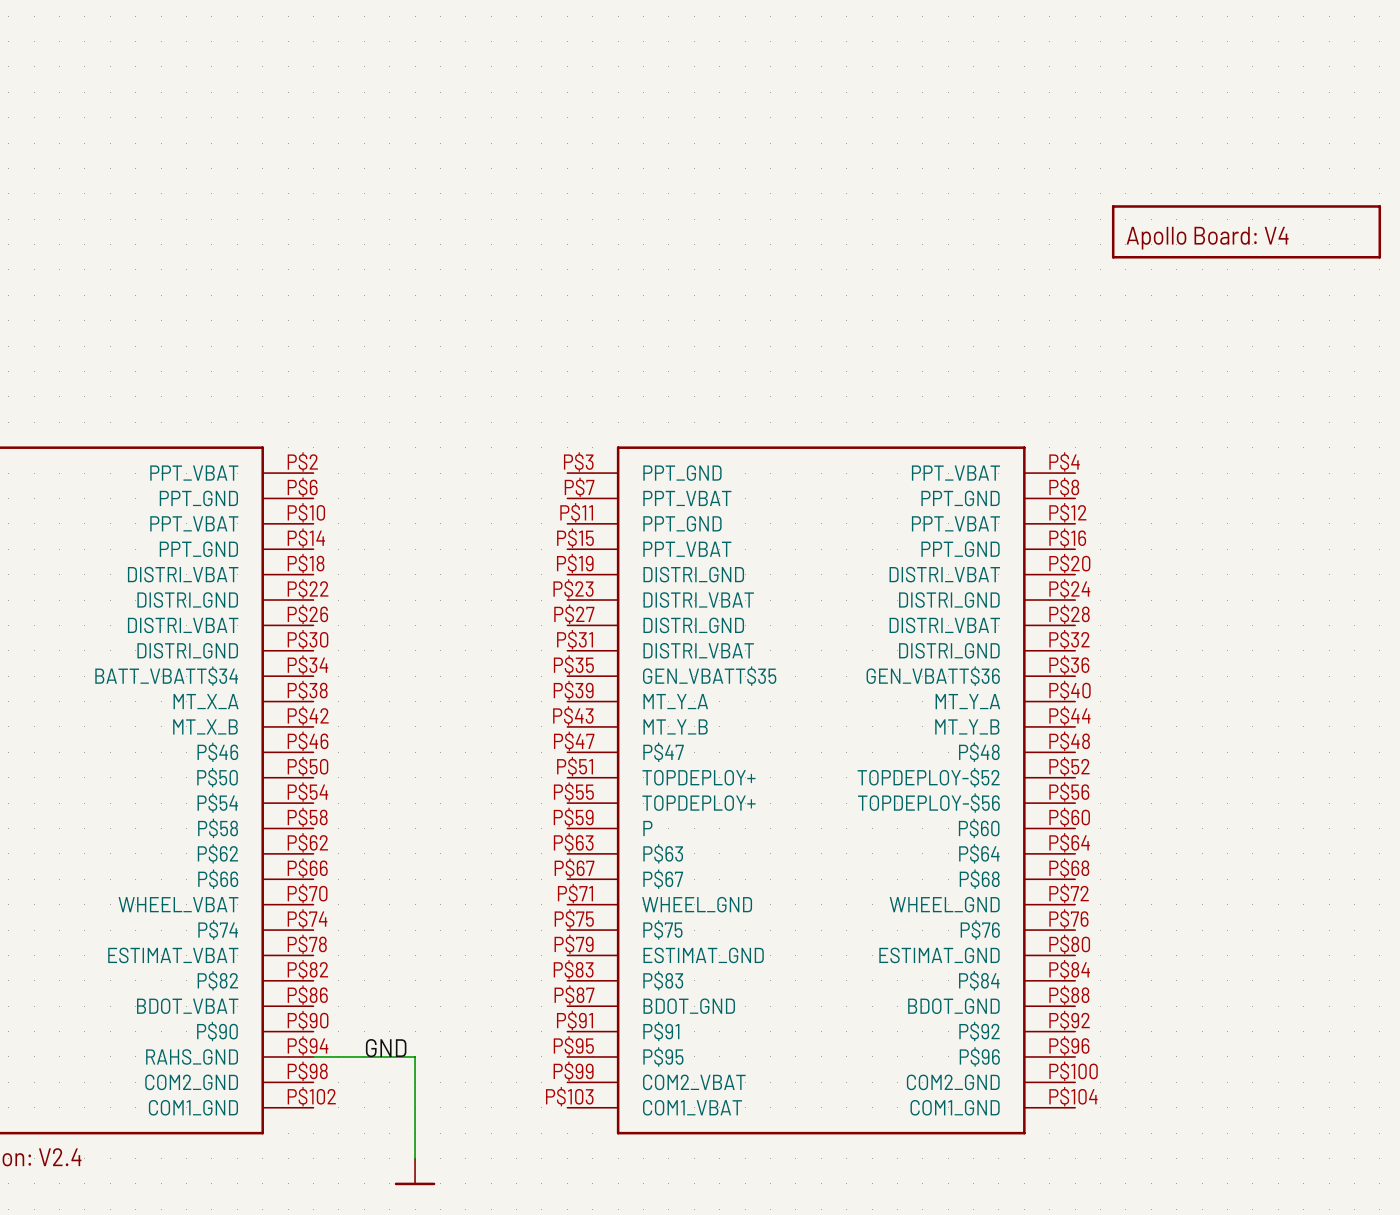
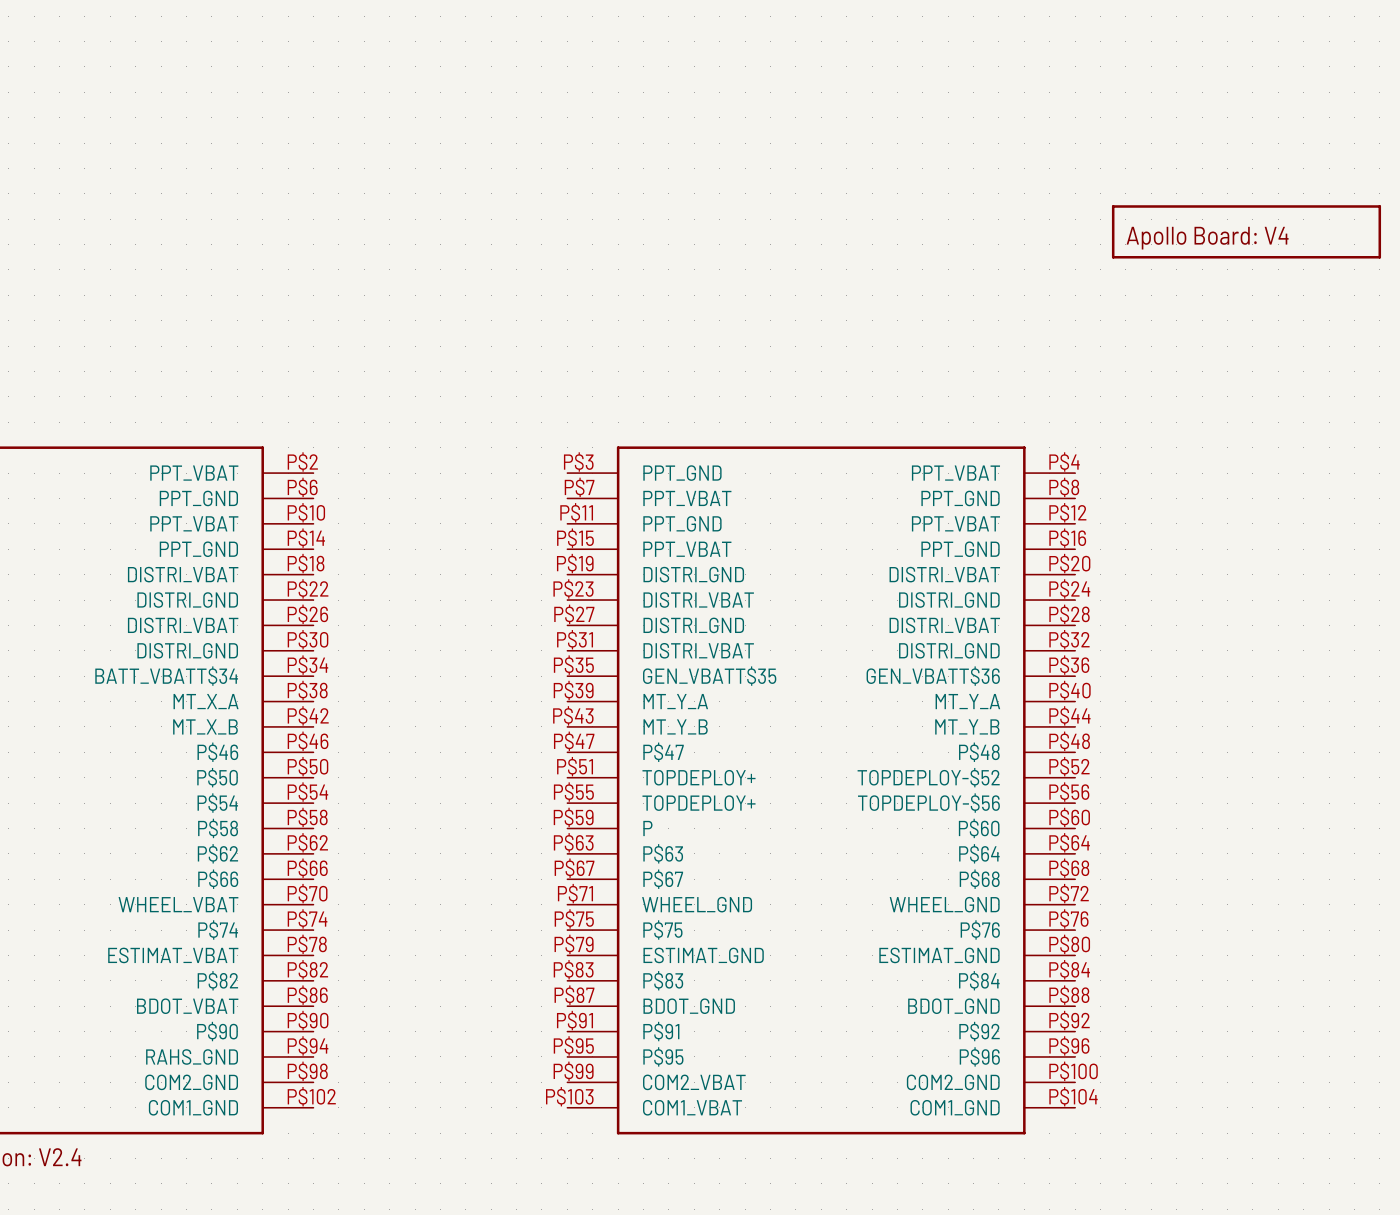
label: GND (386, 1048) -> none
wire: (313, 1056) (415, 1056) (415, 1158) -> none
power symbol: (415, 1171) -> none

